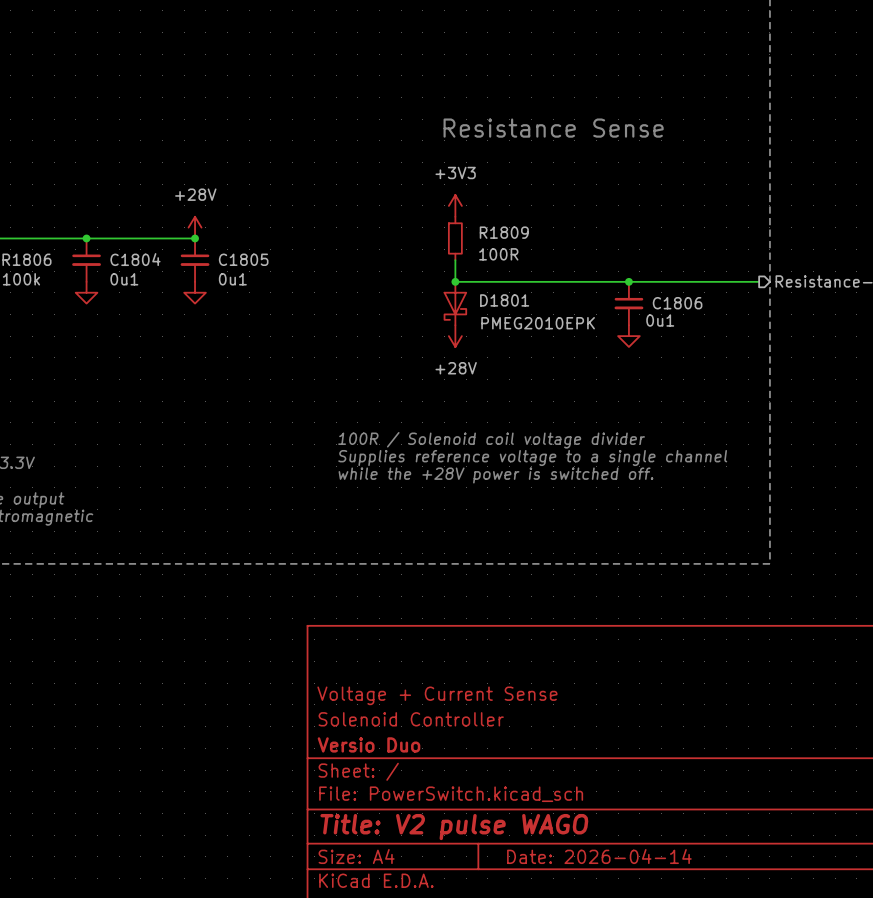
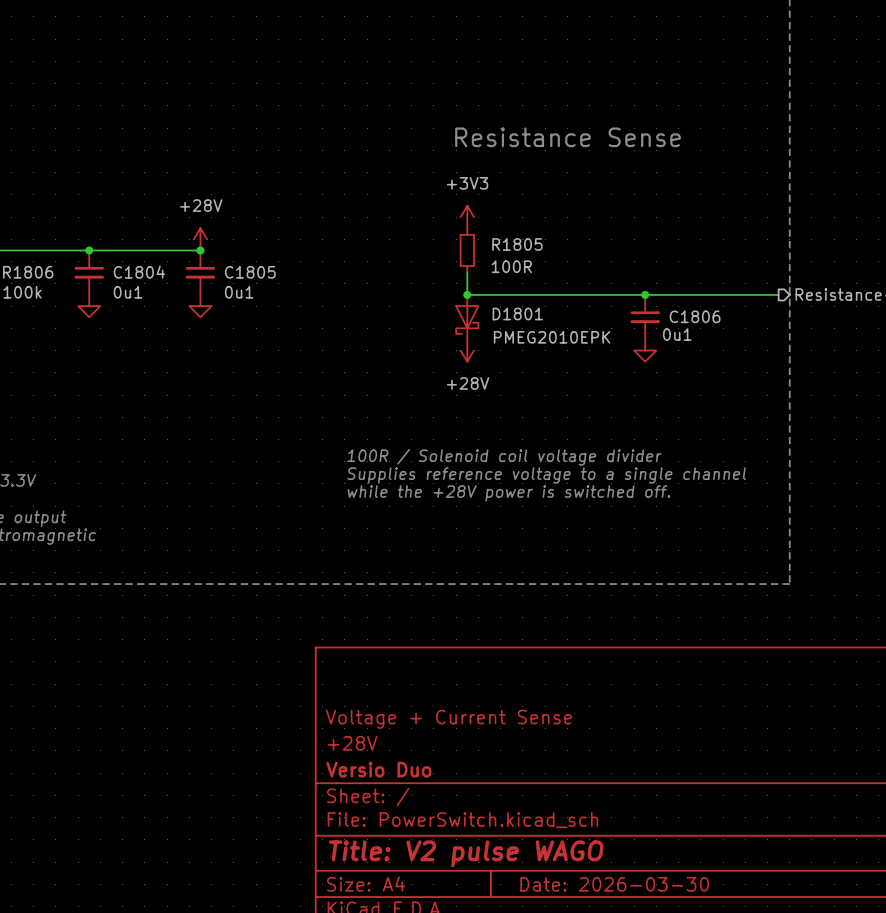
R1809 name: R1809 (504, 232) -> R1805 (517, 244)
title block: Solenoid Controller (411, 719) -> +28V (352, 743)
title block: Date: 2026-04-14 (599, 856) -> Date: 2026-03-30 (614, 884)

